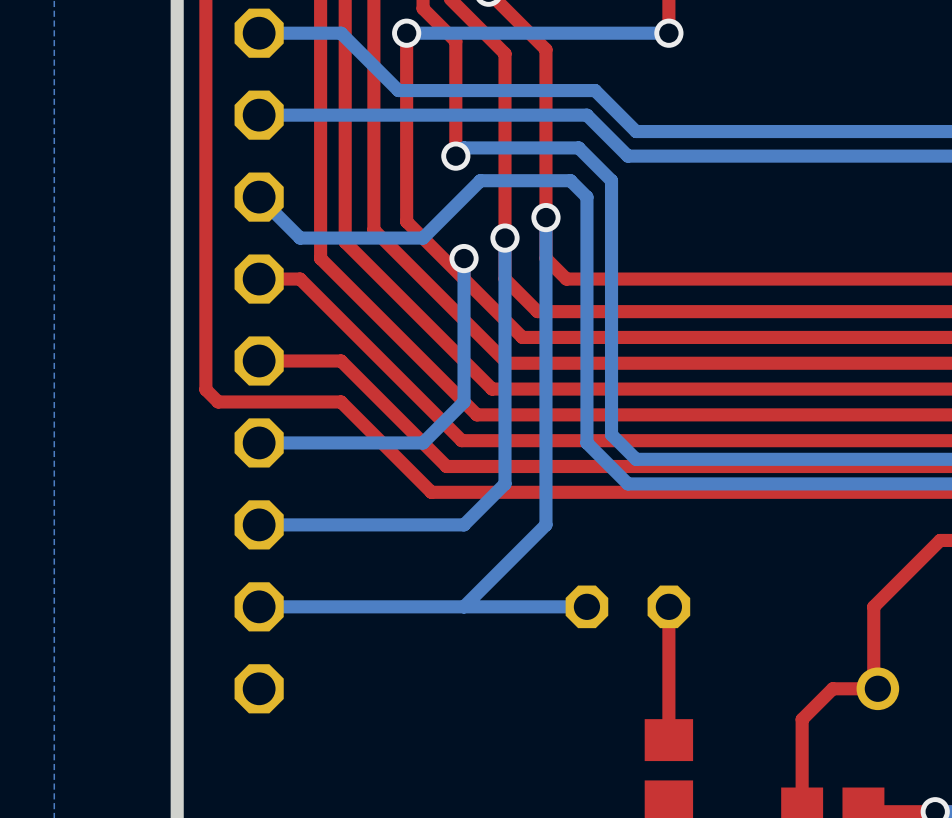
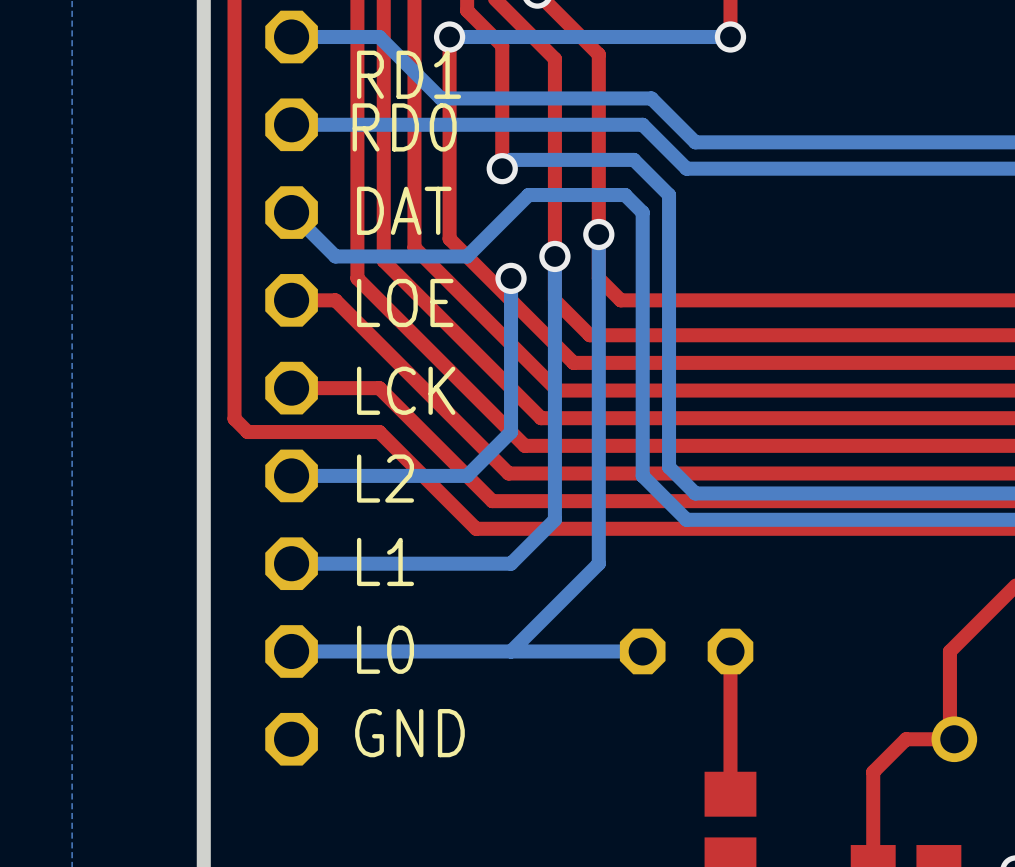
RD1 name: none -> RD1 (409, 74)
RD0 name: none -> RD0 (404, 127)
DAT name: none -> DAT (404, 210)
LOE name: none -> LOE (405, 302)
LCK name: none -> LCK (406, 390)
L2 name: none -> L2 (385, 478)
L1 name: none -> L1 (385, 561)
L0 name: none -> L0 (385, 649)
GND name: none -> GND (409, 733)

